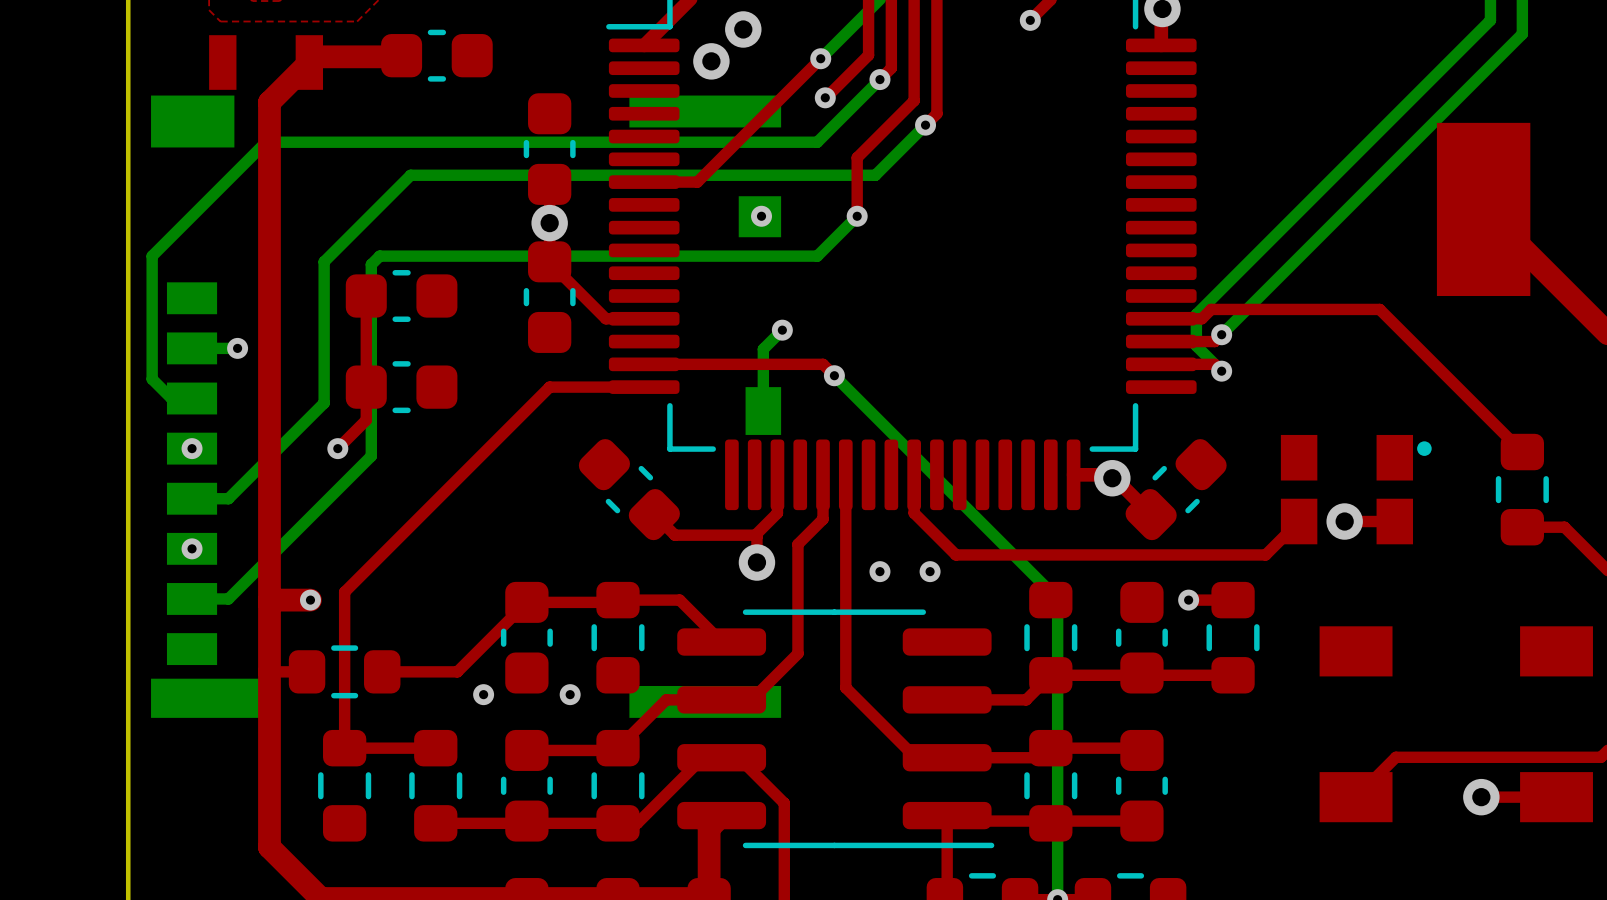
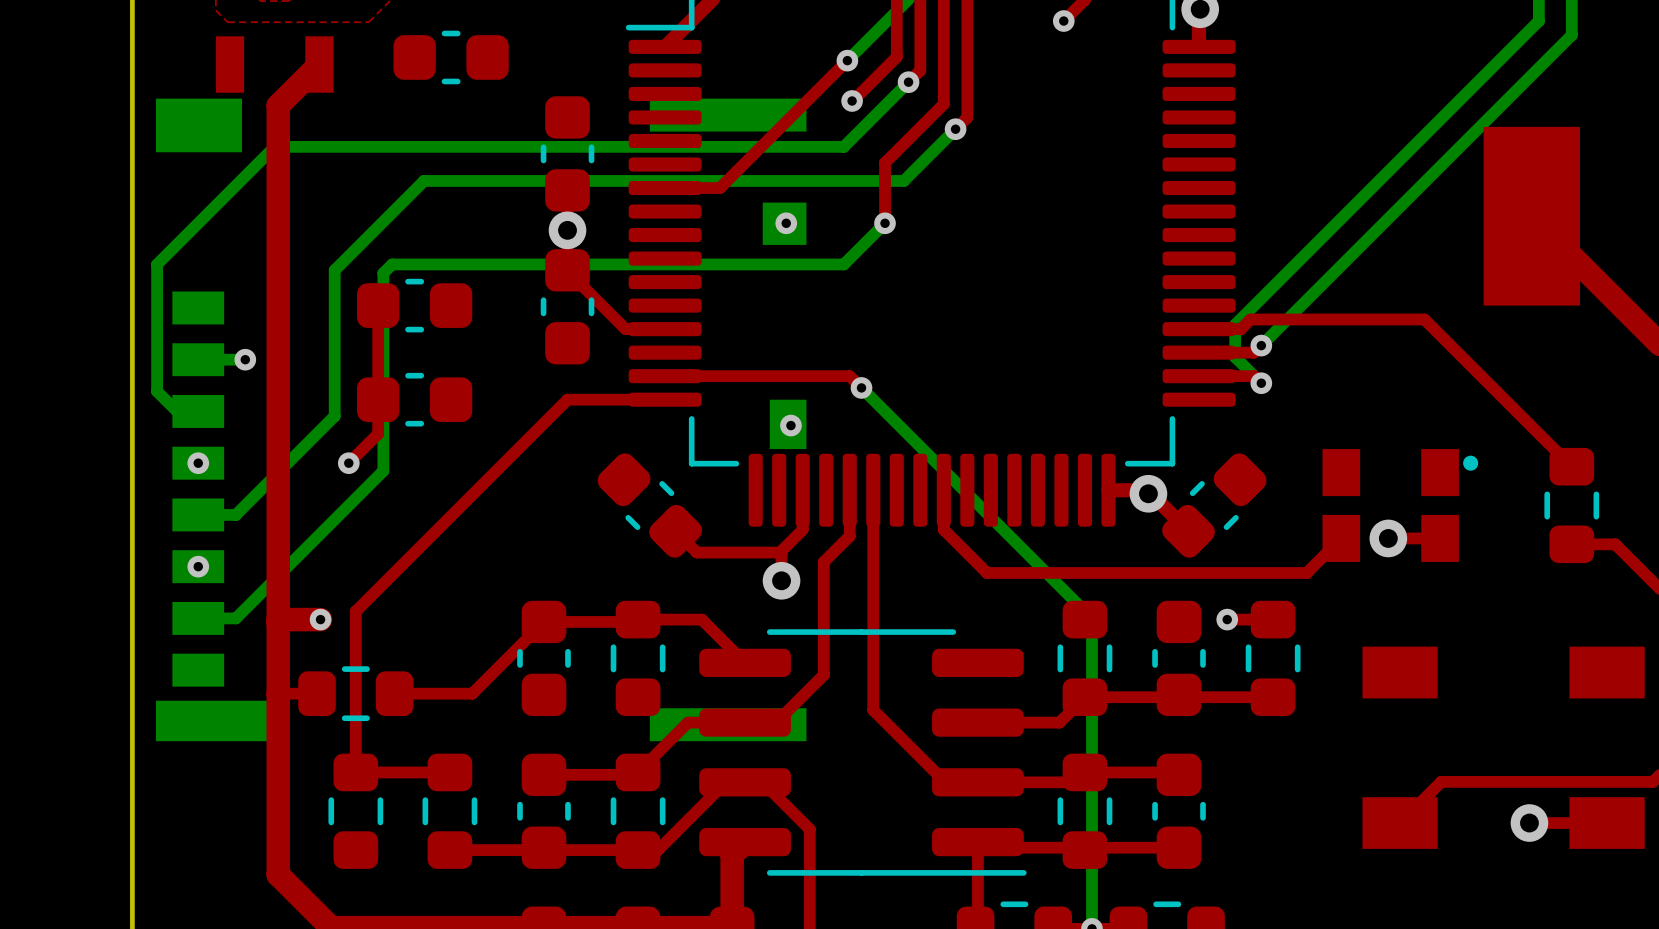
via: (743, 29) -> none
top track: (401, 55) (315, 56) (309, 62) -> none
via: (711, 61) -> none
bottom track: (782, 330) (763, 349) (763, 411) -> none
via position: (782, 330) -> (790, 425)
via: (879, 571) -> none
via: (930, 571) -> none
via: (483, 694) -> none
via: (570, 694) -> none

